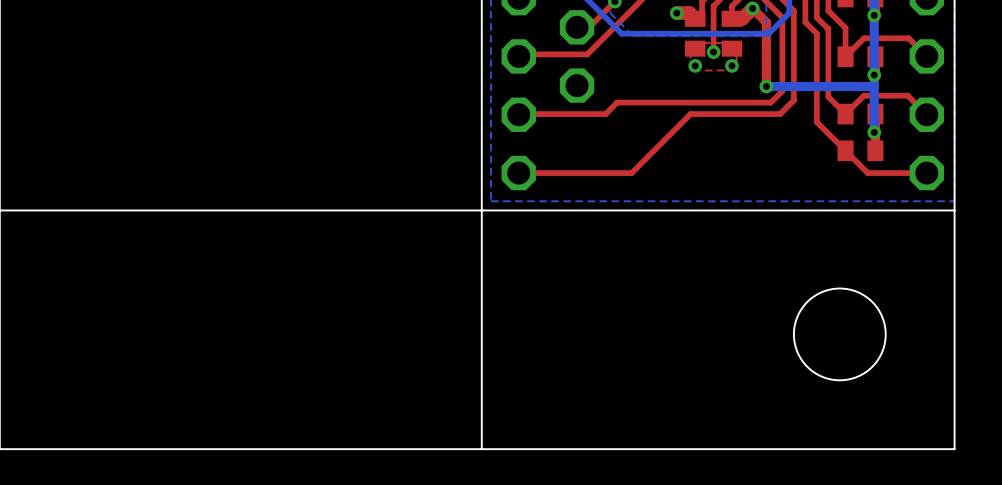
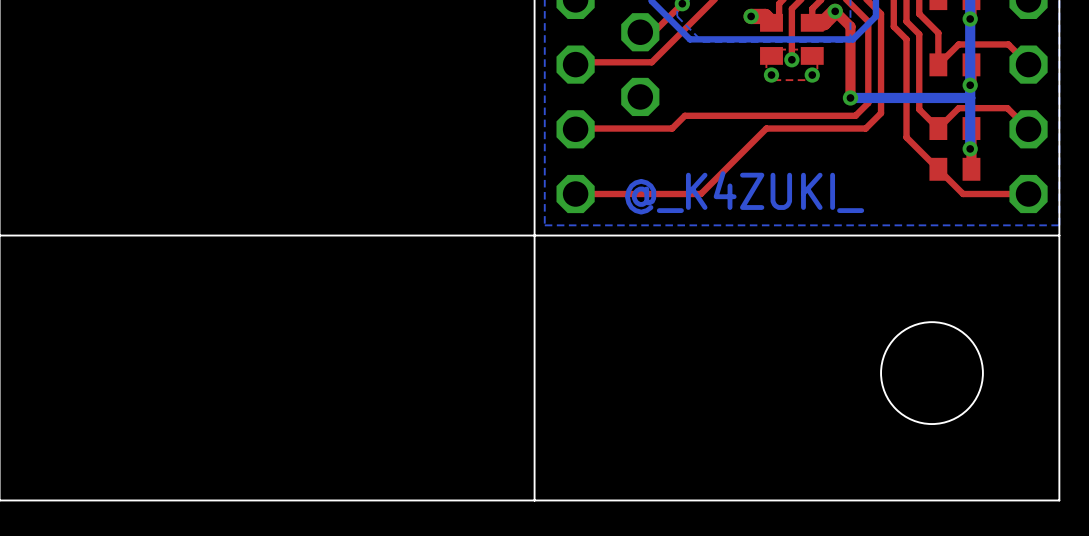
text: none -> @_K4ZUKI_ (744, 192)

